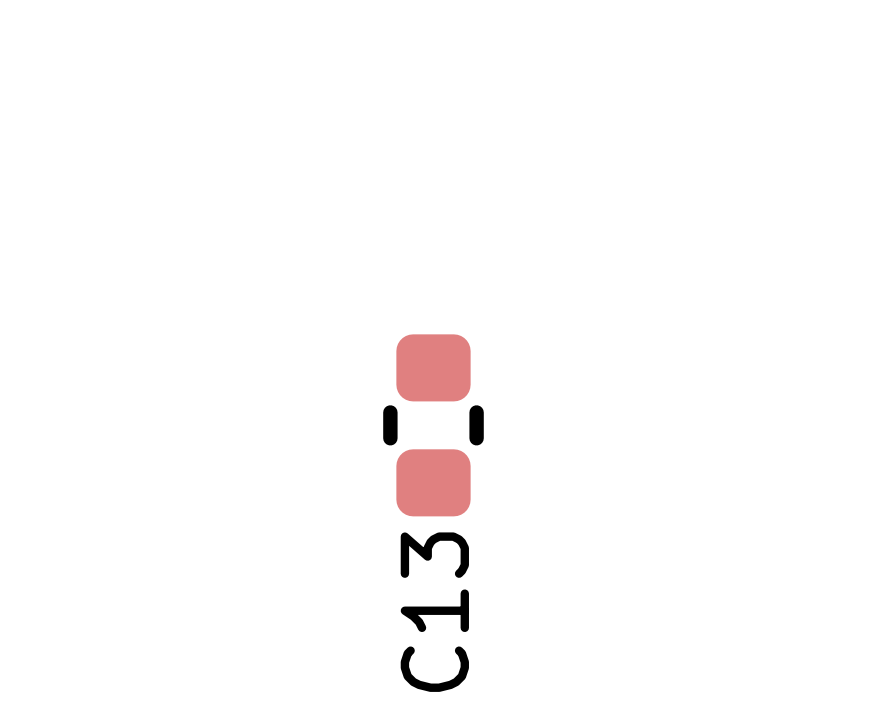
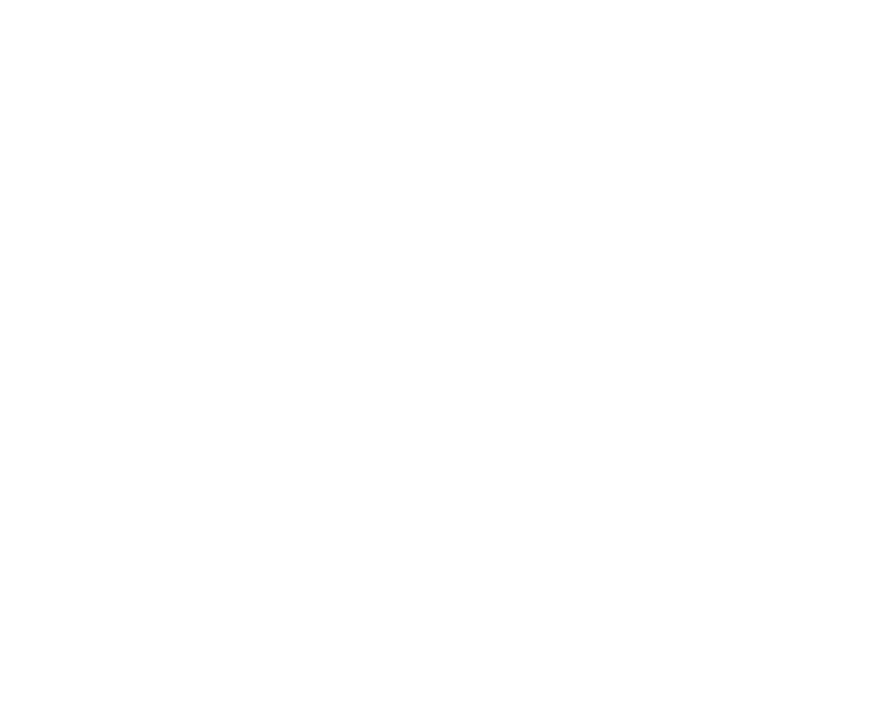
C13: (433, 425) -> none

